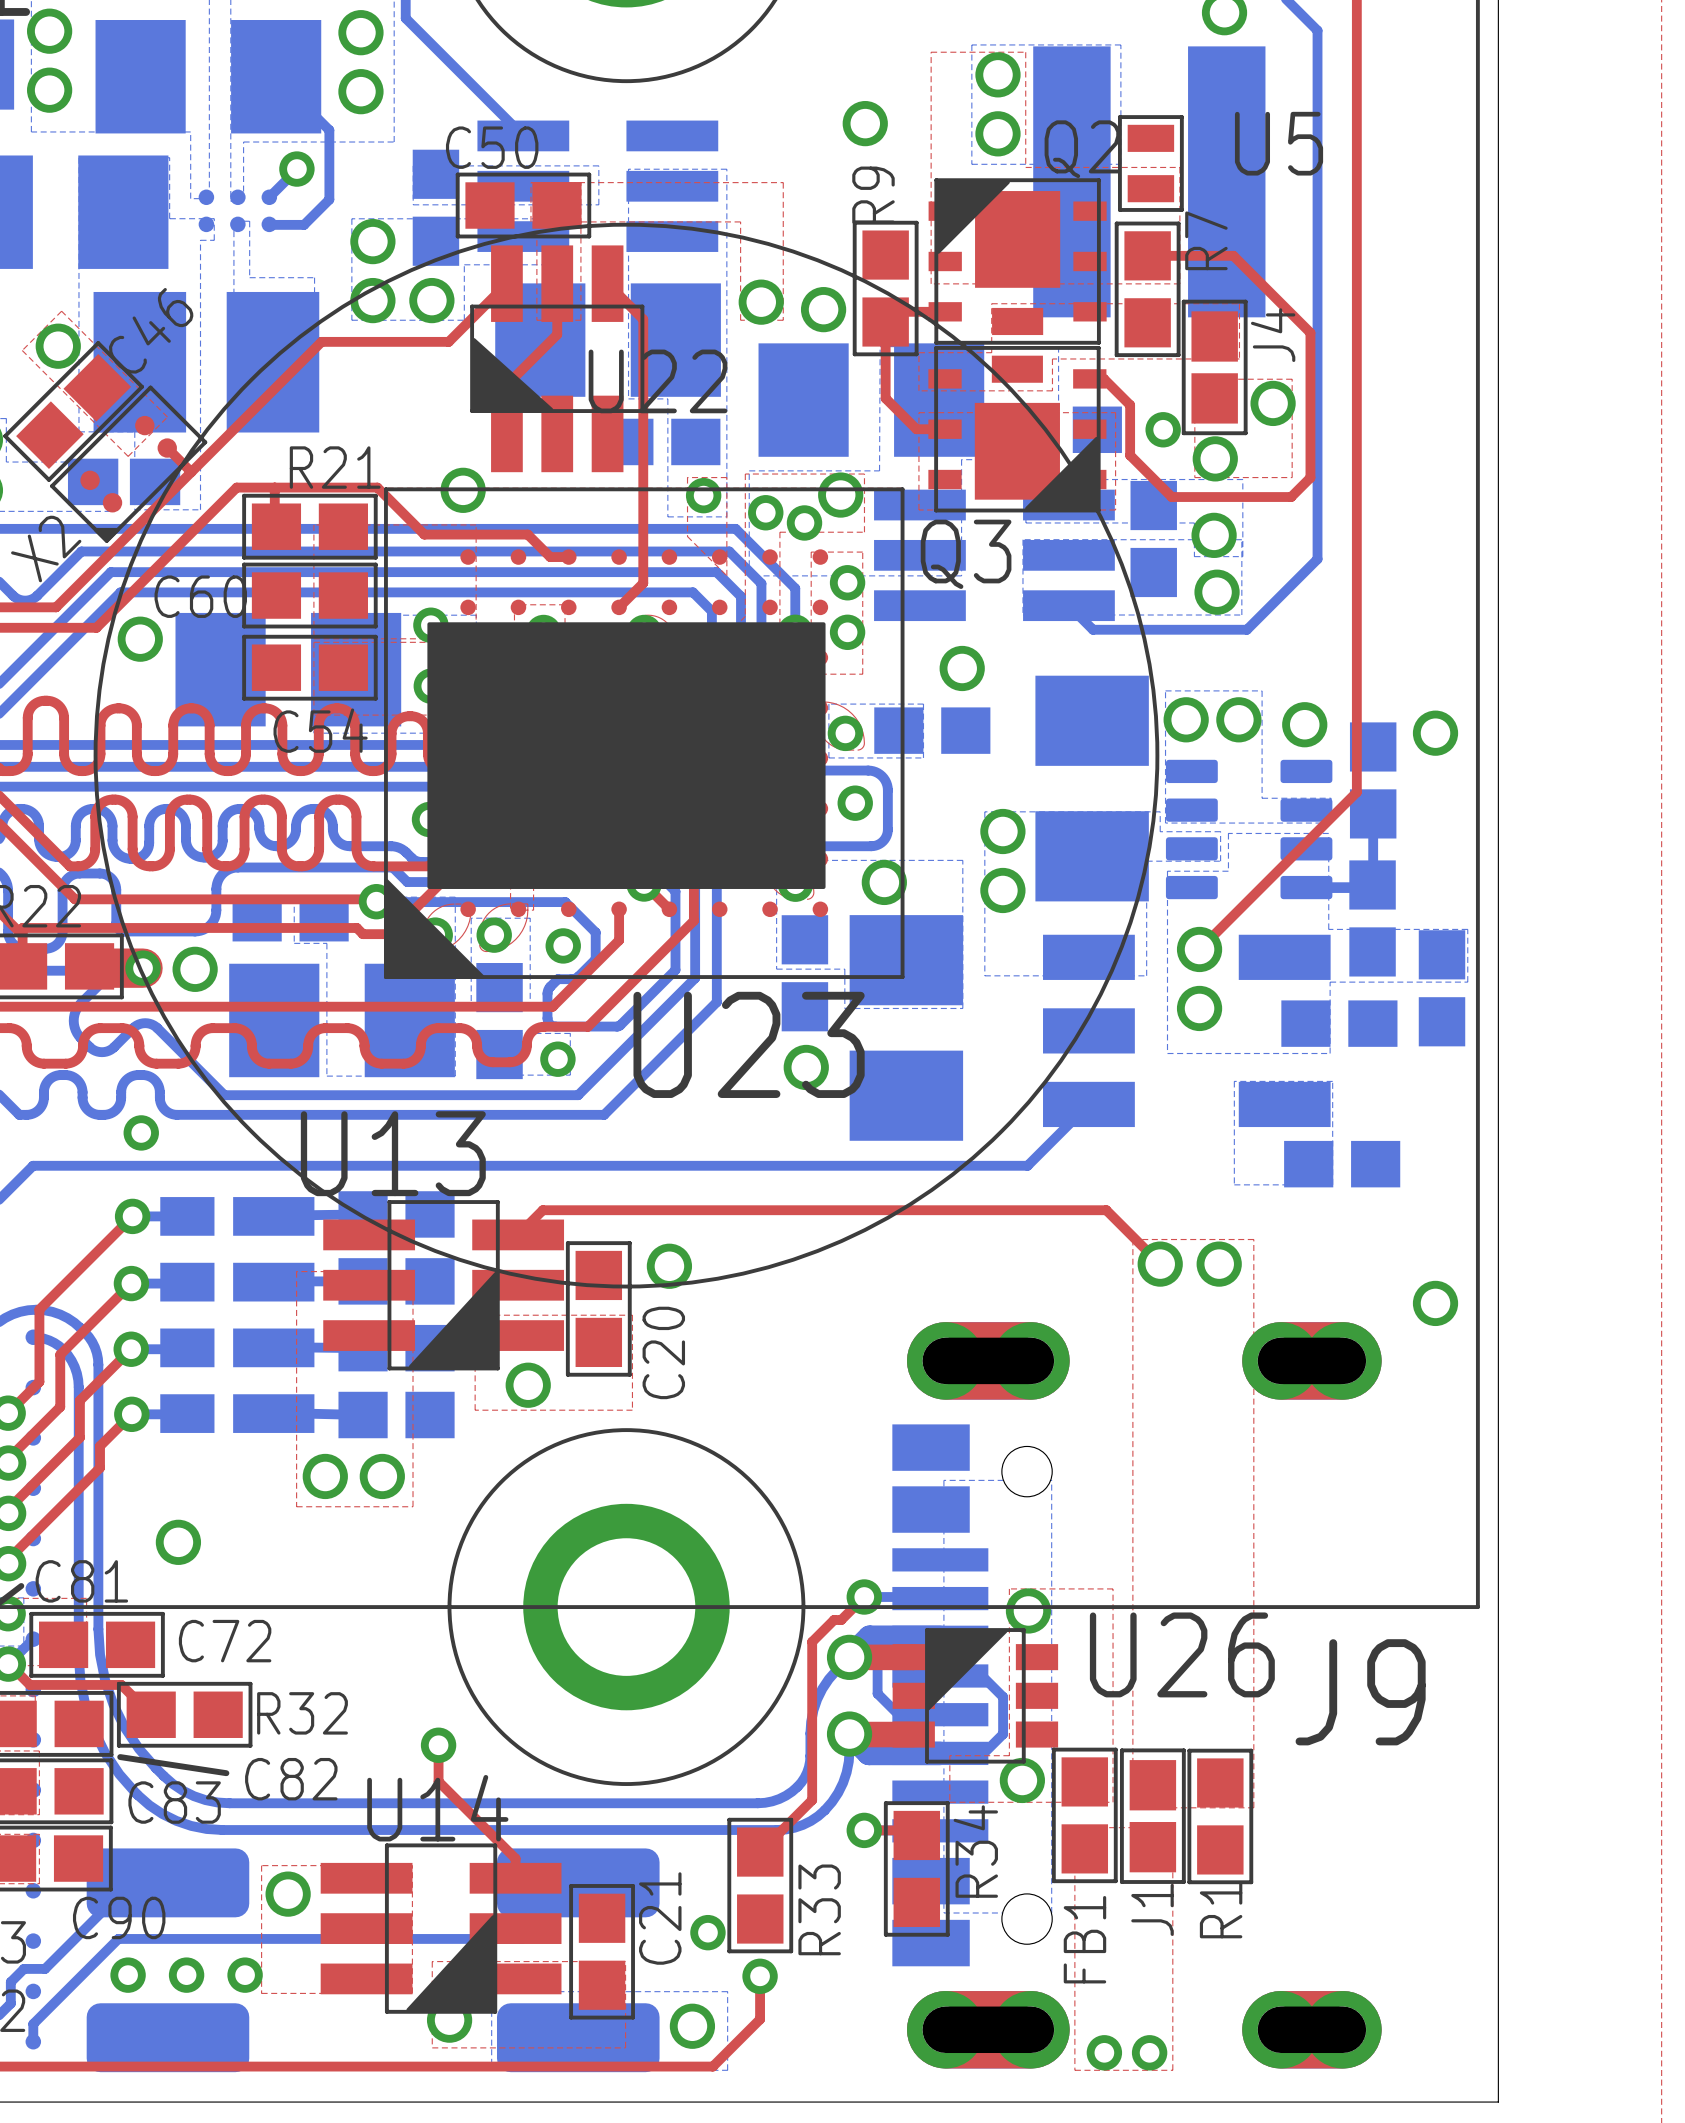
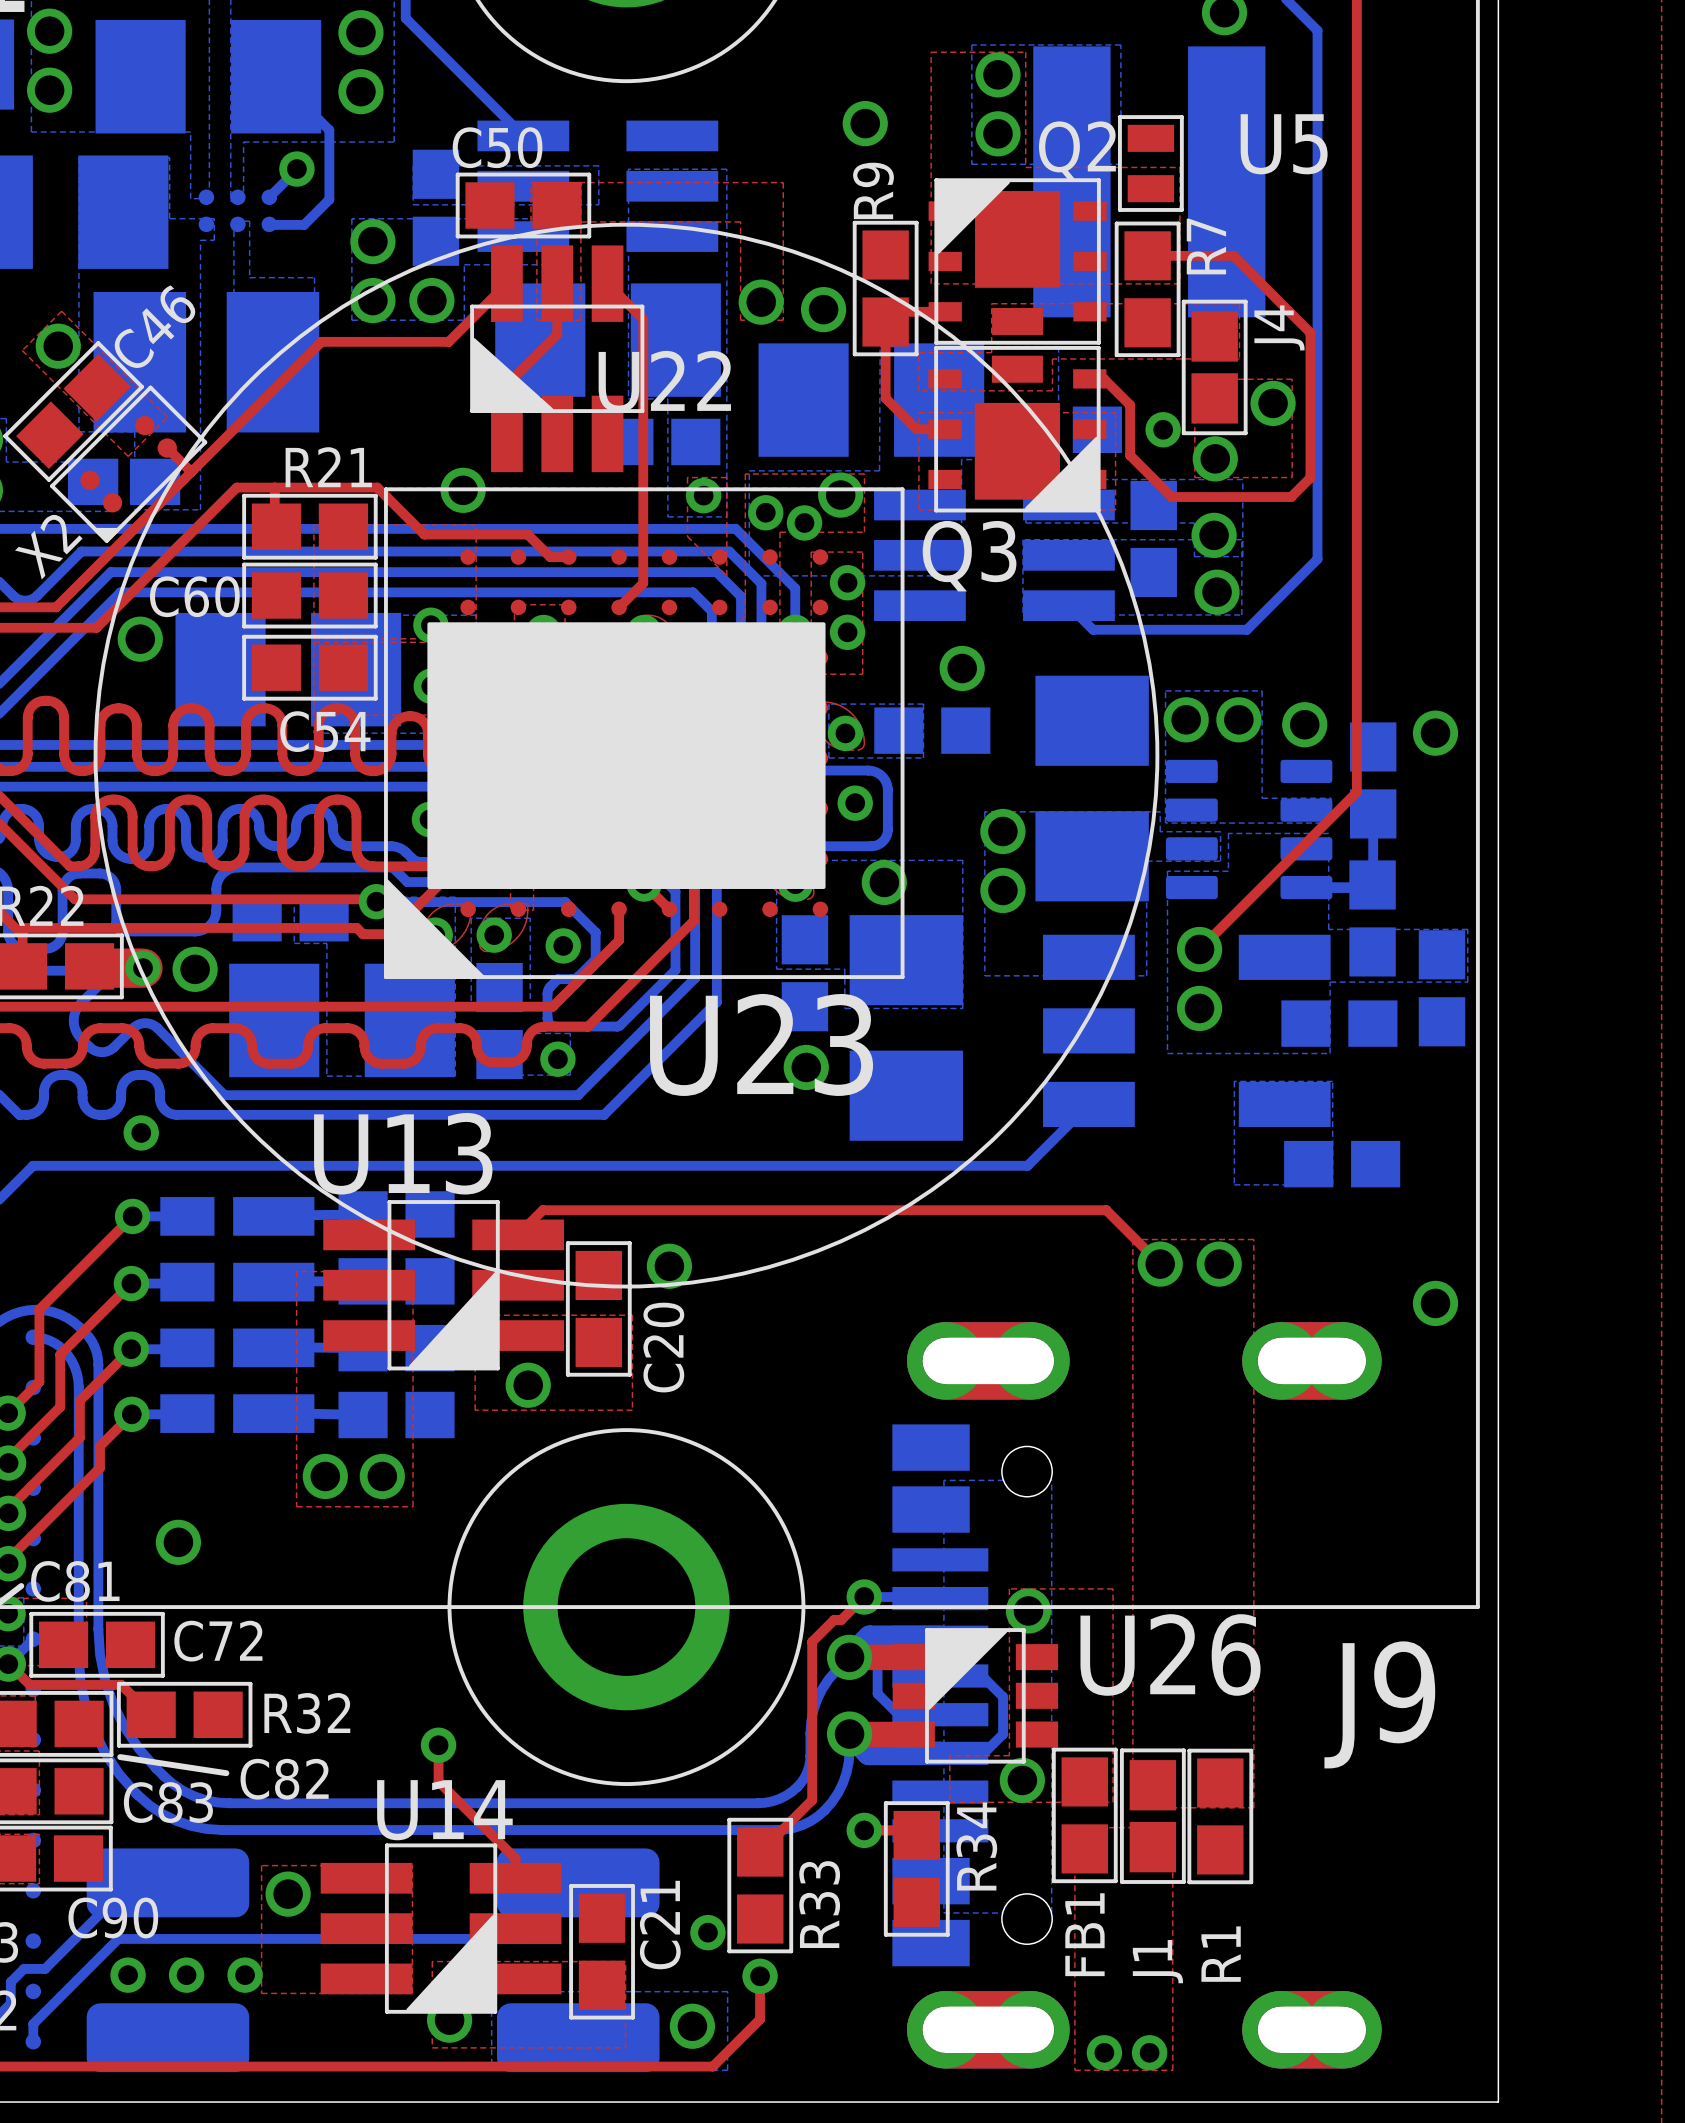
J1 name position: J1 (1152, 1909) -> J1 (1157, 1961)
R1 name position: R1 (1221, 1909) -> R1 (1221, 1954)

